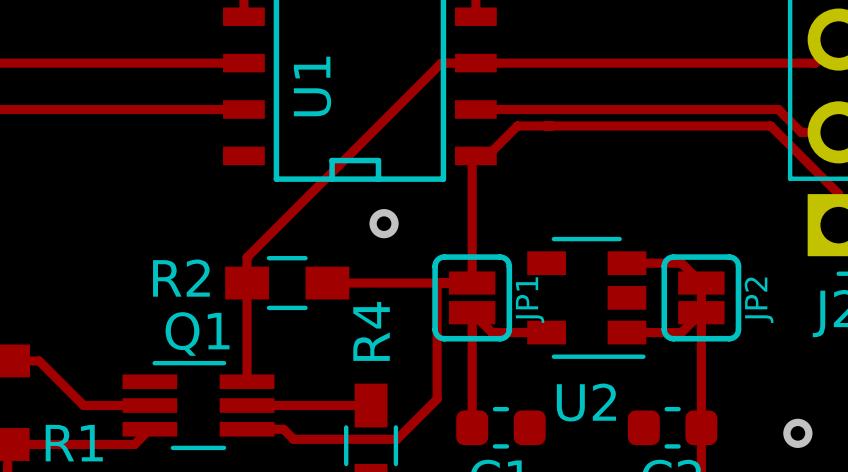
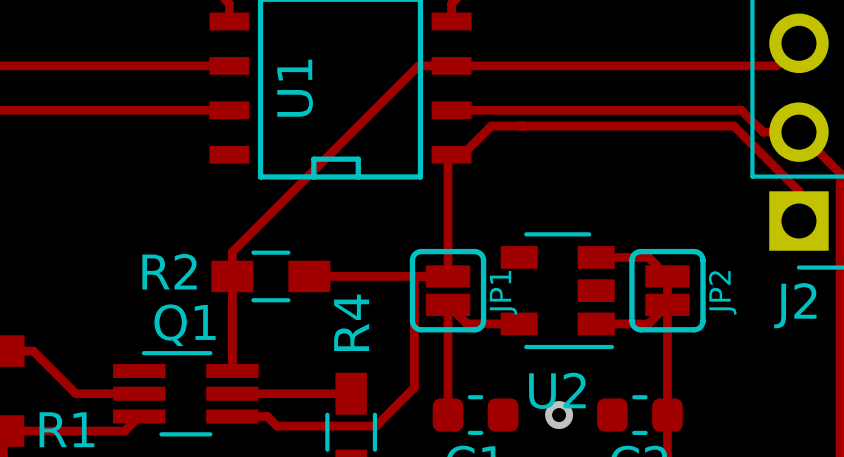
via: (384, 223) -> none
via: none -> (559, 415)
via: (797, 433) -> none

